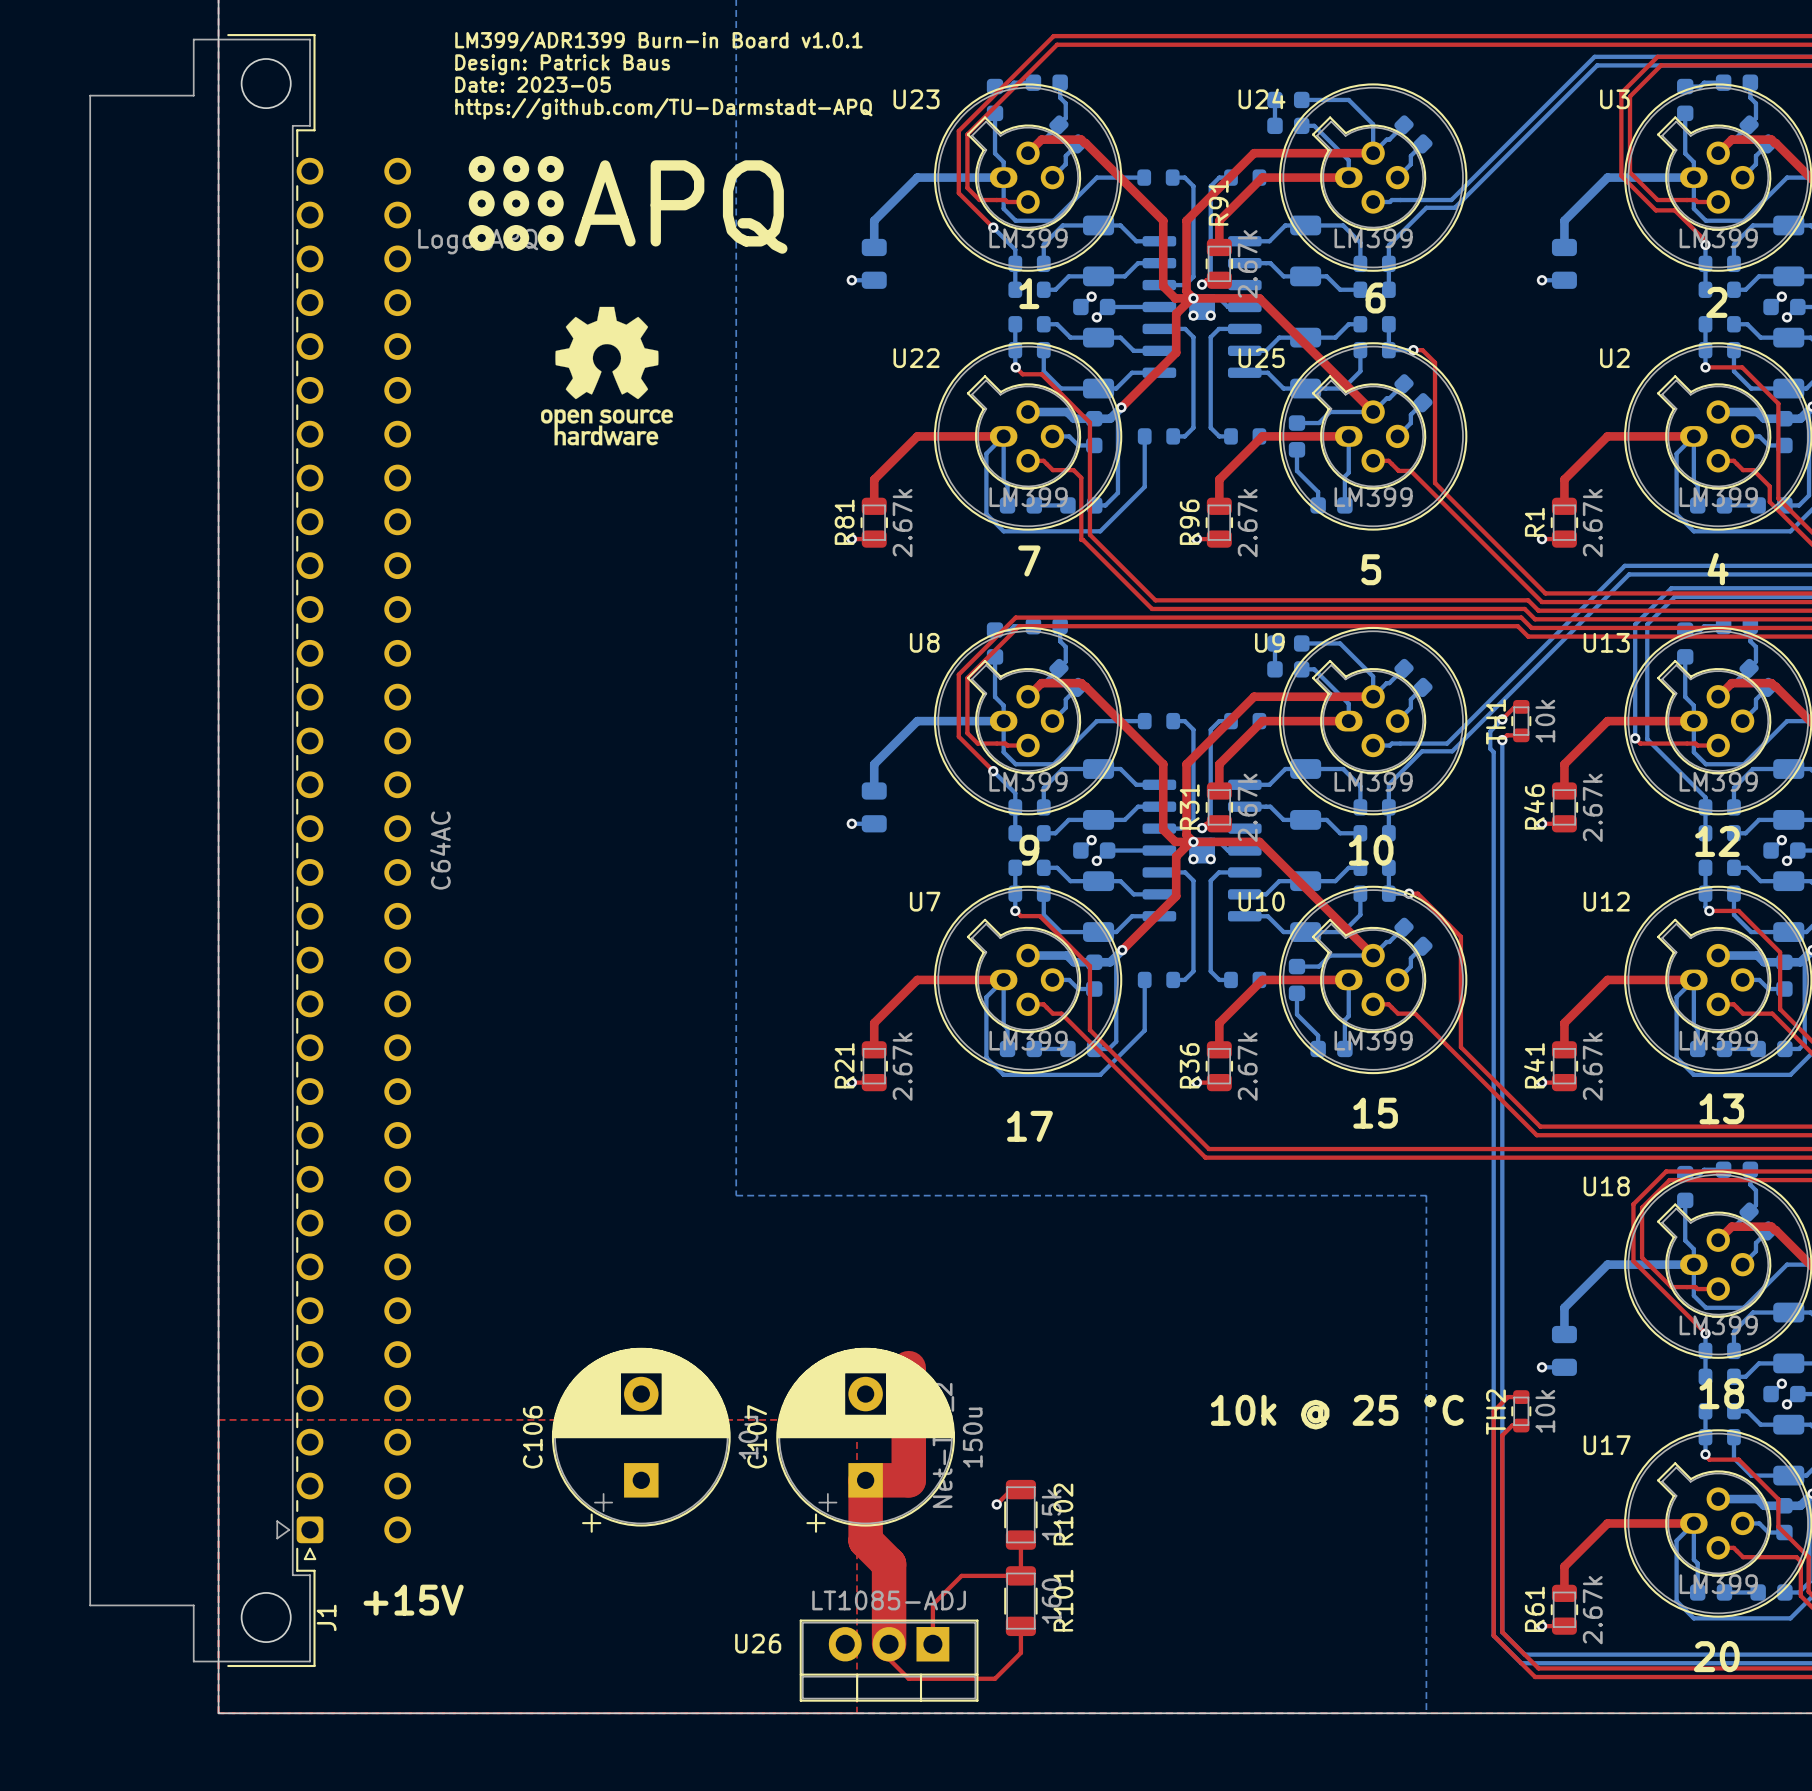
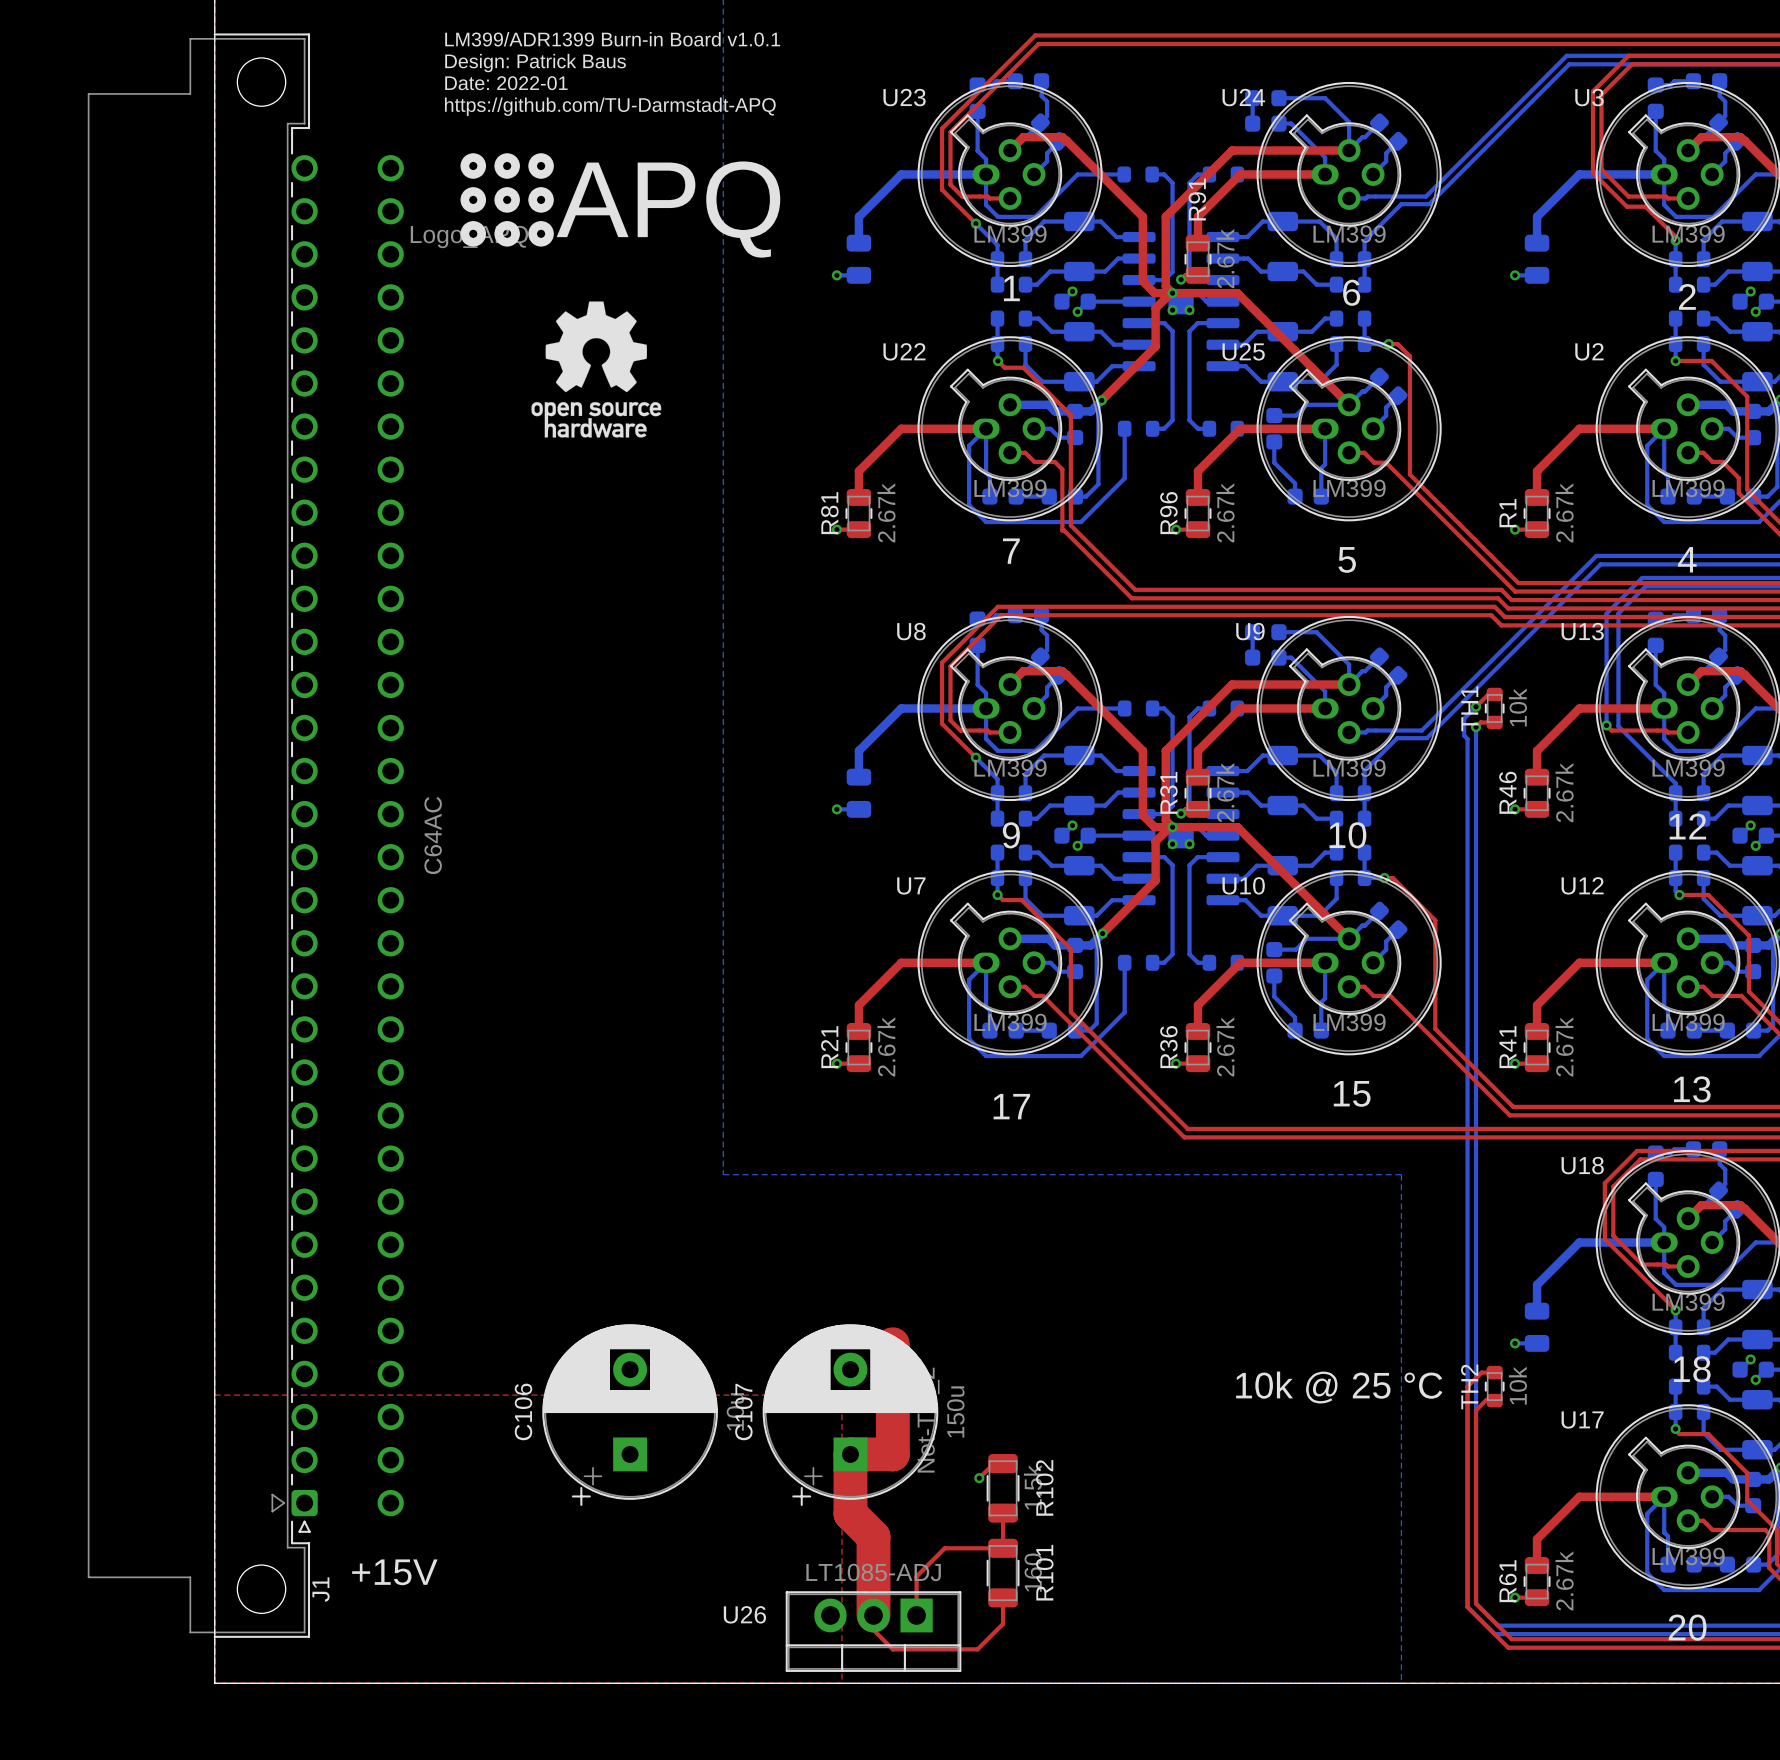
J1 footprint: [89, 34, 412, 1668] -> [87, 33, 404, 1638]
text: Date: 2023-05 (533, 84) -> Date: 2022-01 (506, 83)

